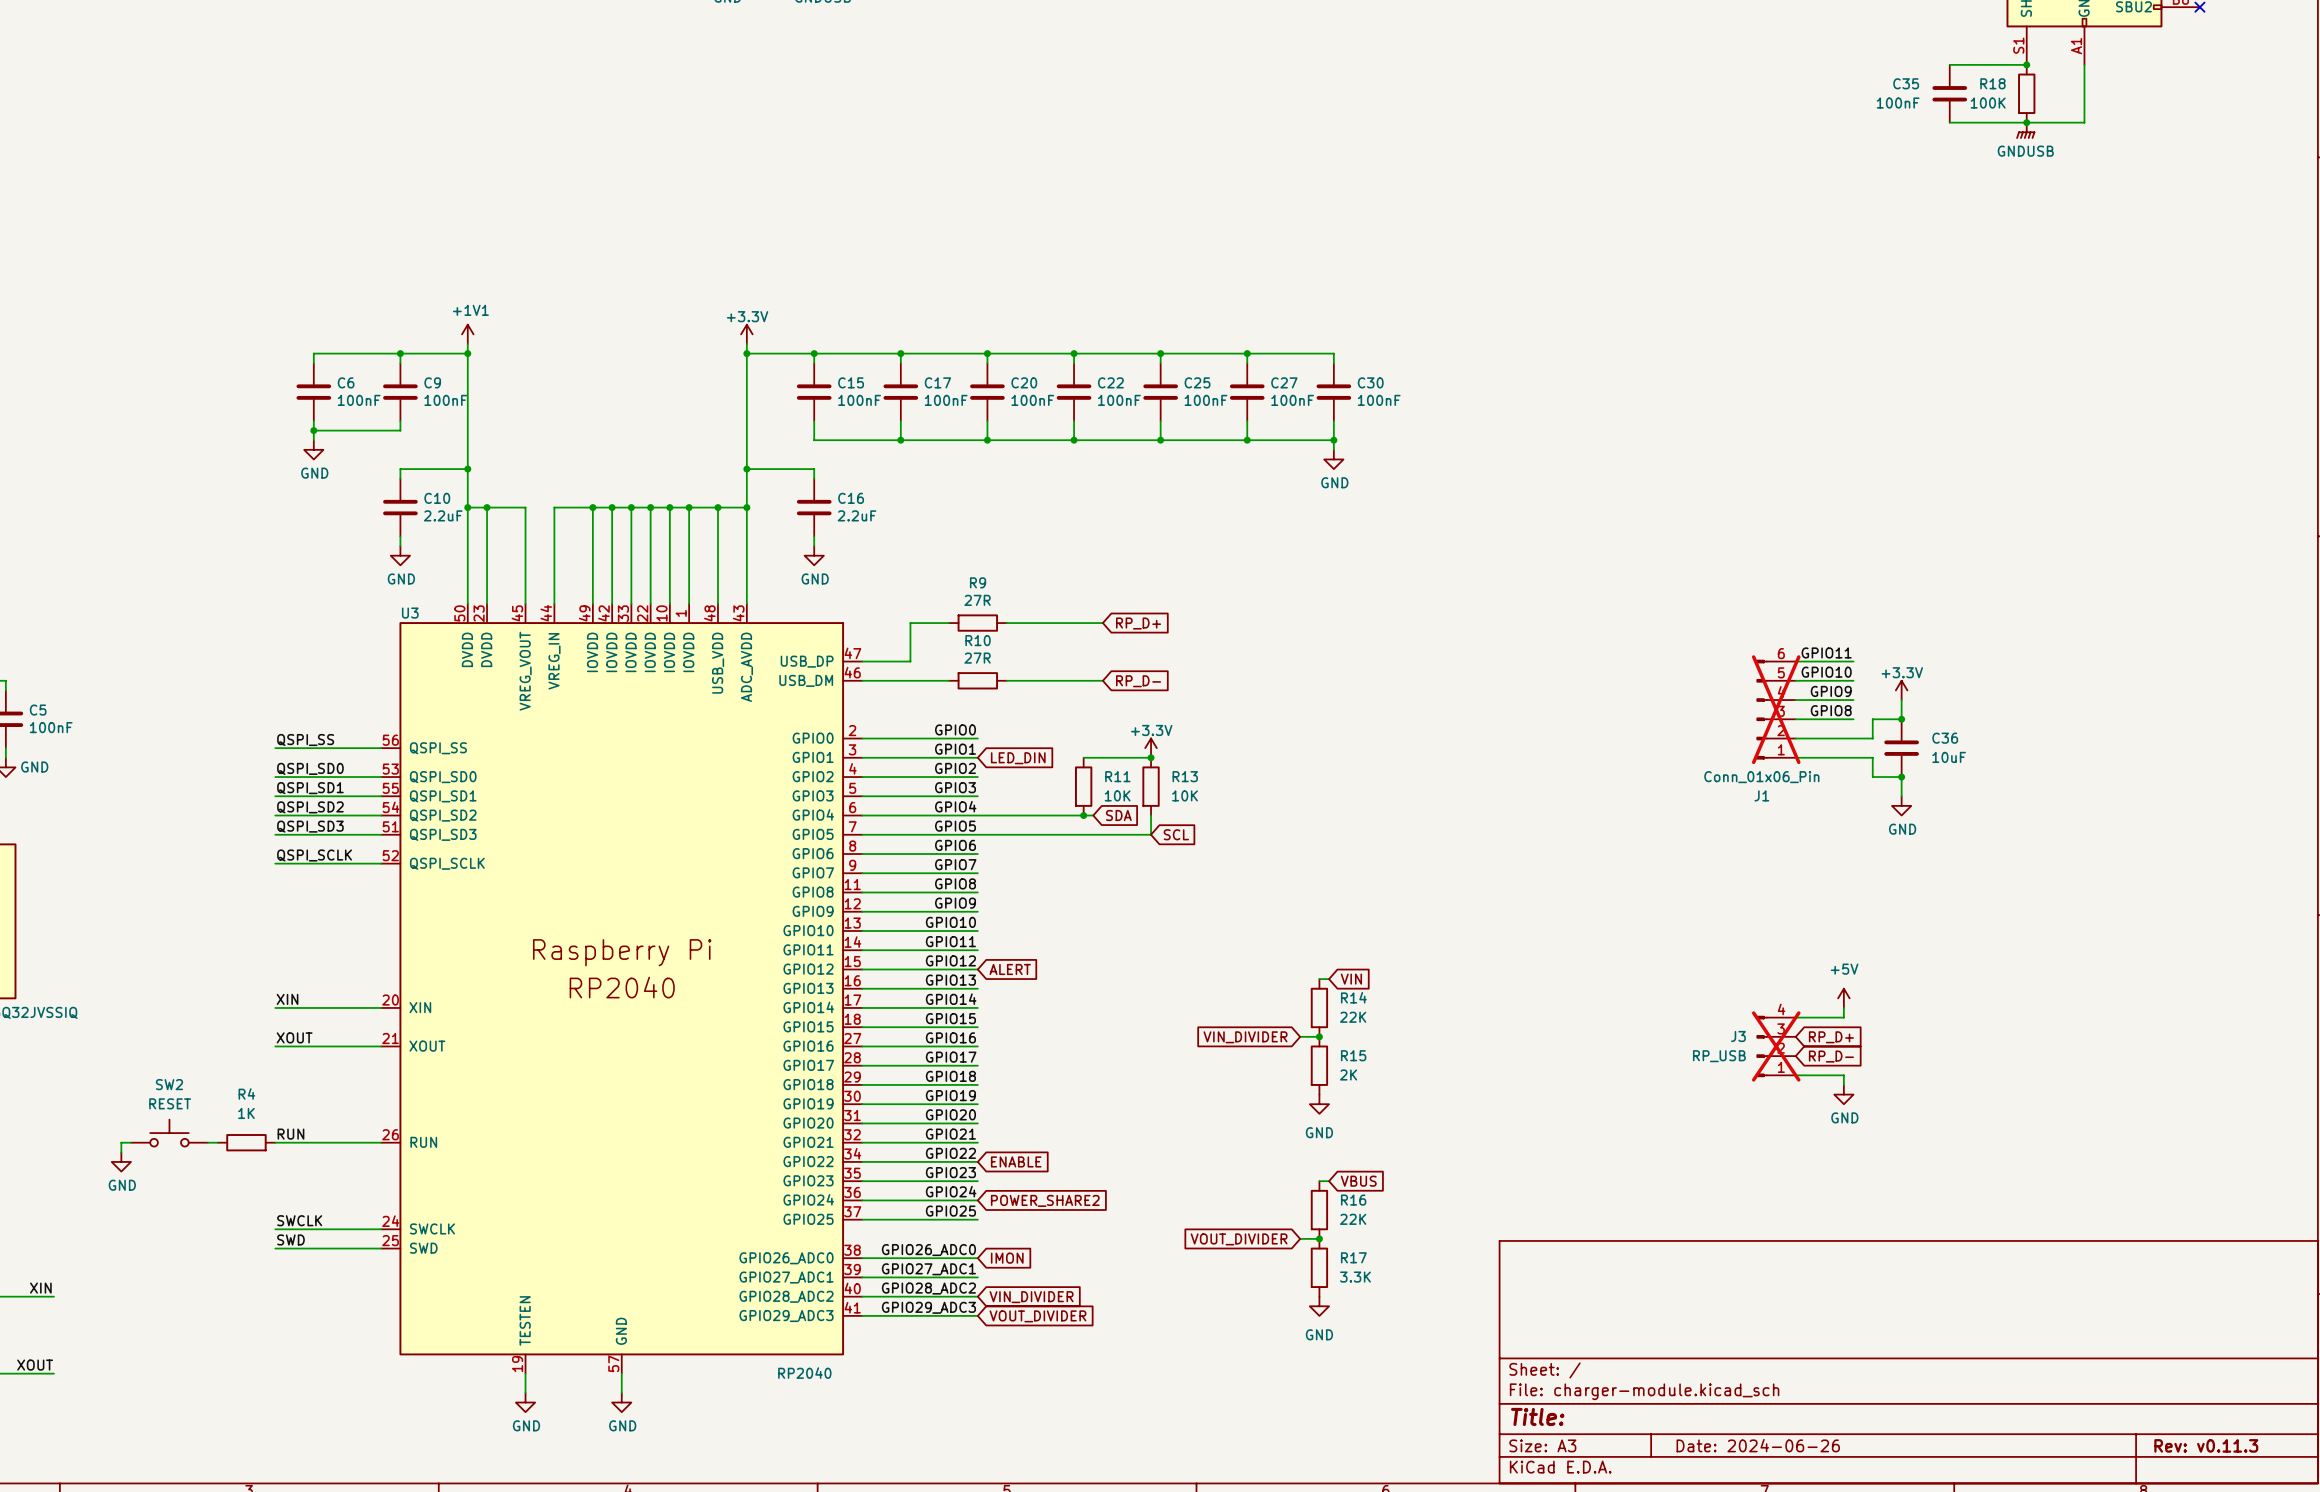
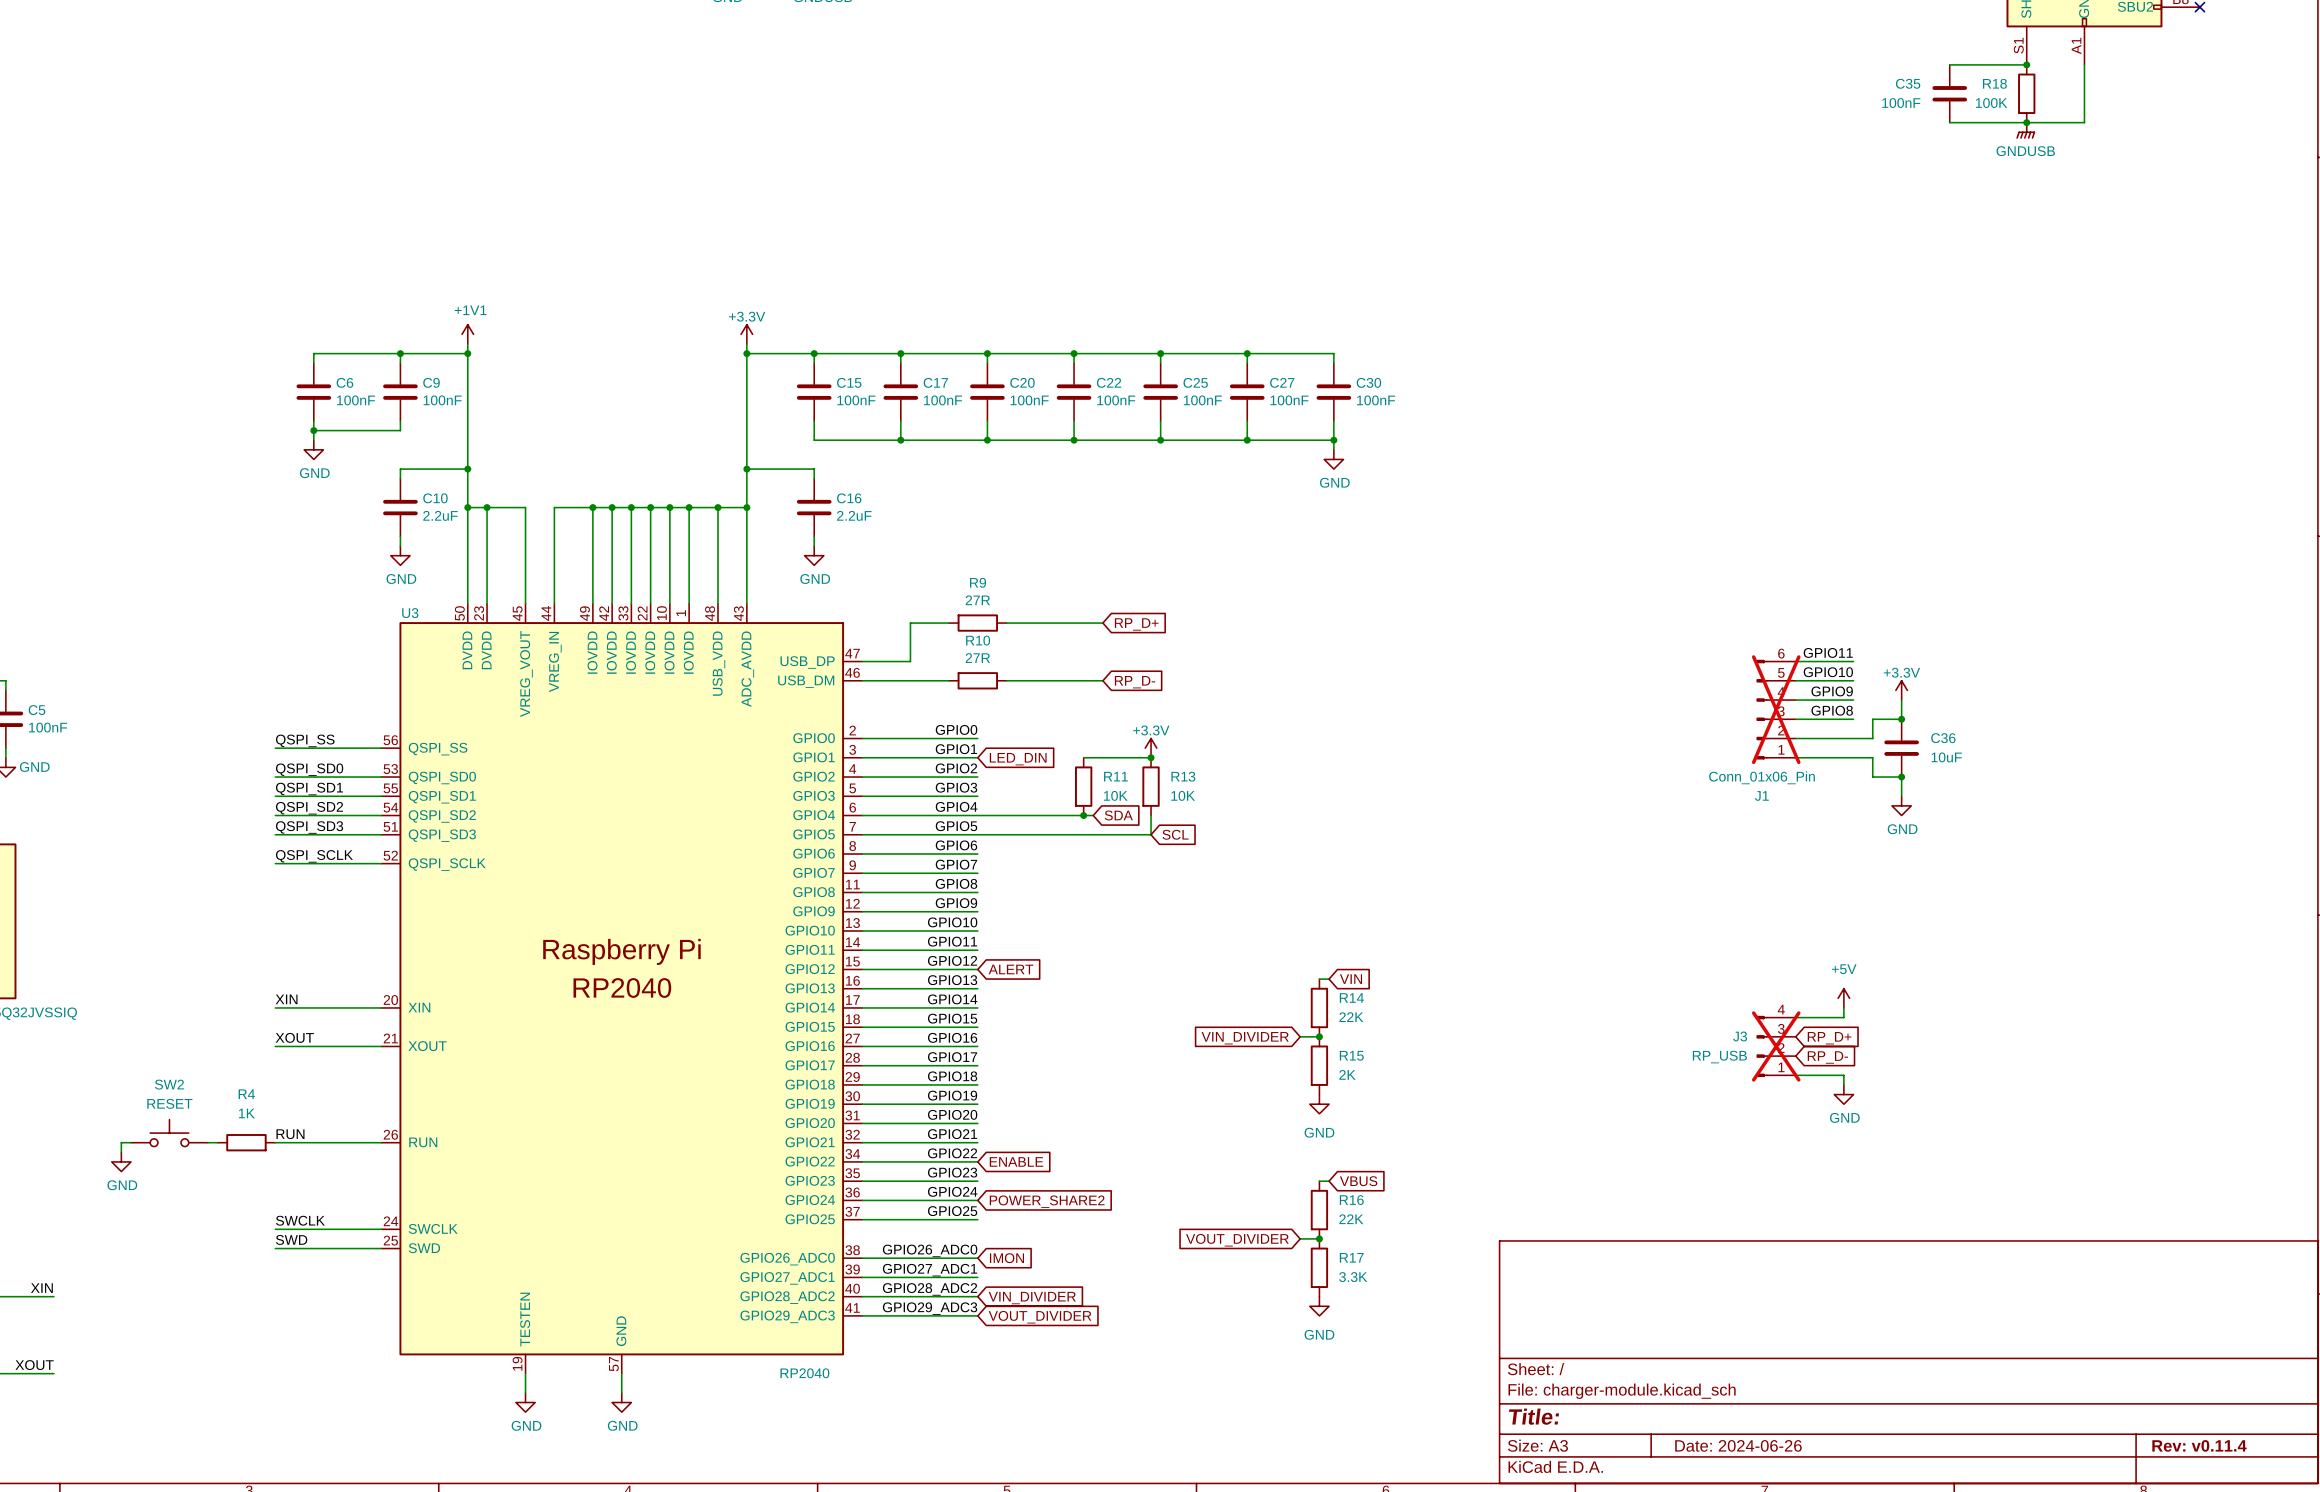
title block: Rev: v0.11.3 (2206, 1445) -> Rev: v0.11.4 (2199, 1445)

